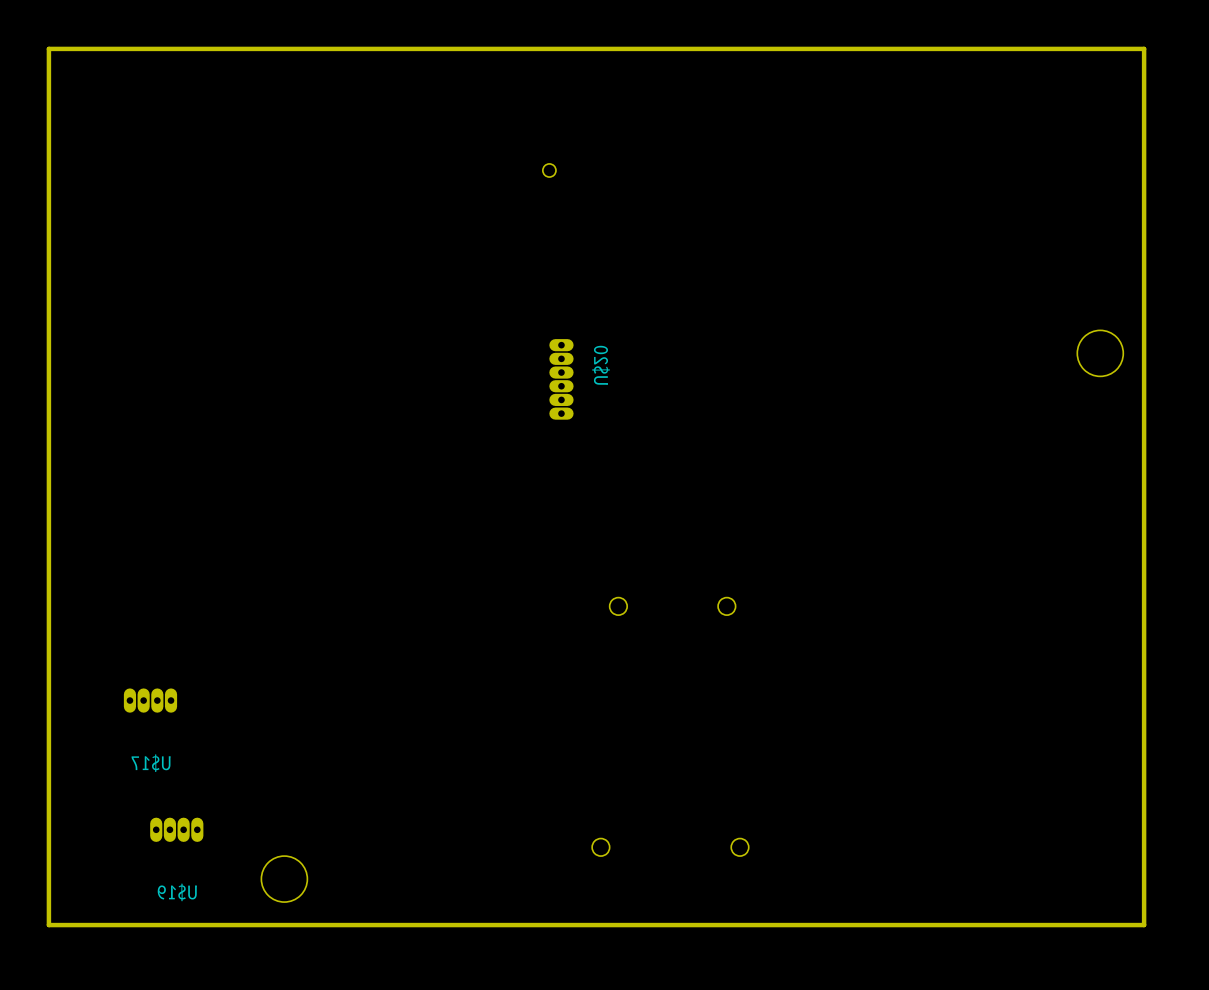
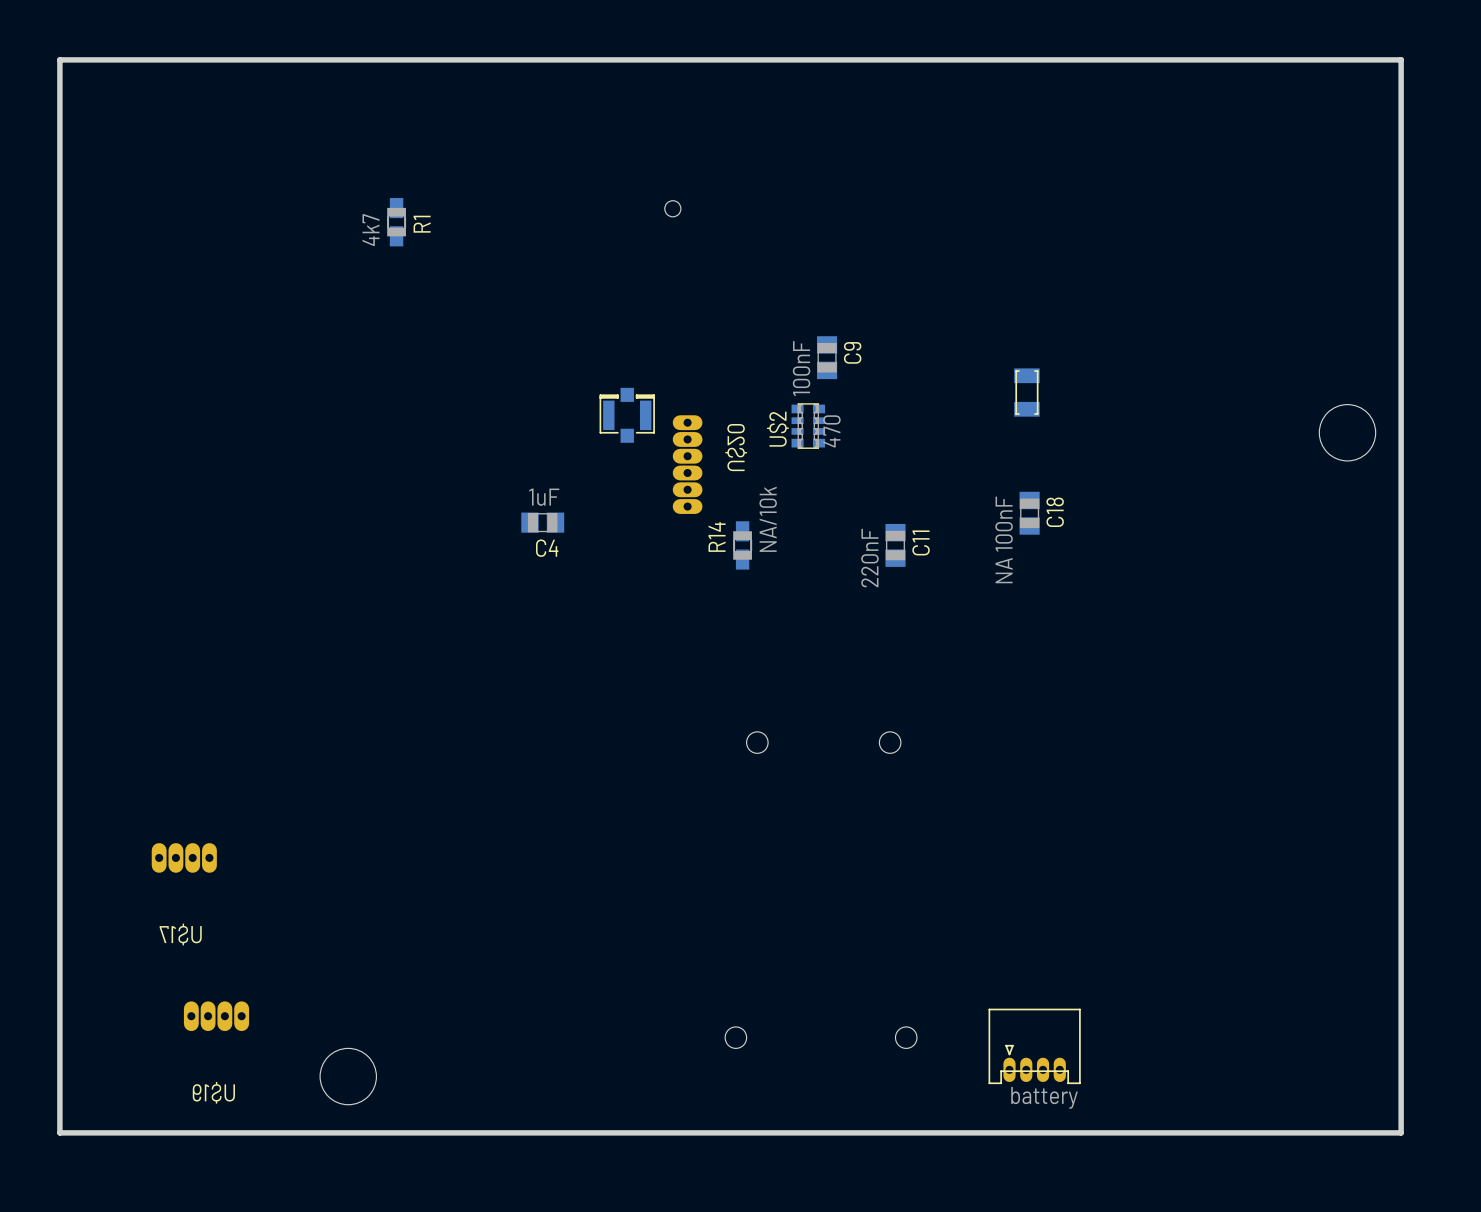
R1: none -> 4k7 (396, 222)
C9: none -> 100nF (827, 357)
part: none -> (1026, 392)
part: none -> (627, 415)
U$2: none -> 470 (808, 426)
C18: none -> NA 100nF (1029, 513)
C4: none -> 1uF (542, 522)
R14: none -> NA/10k (742, 545)
C11: none -> 220nF (895, 545)
part: none -> battery (1034, 1046)

